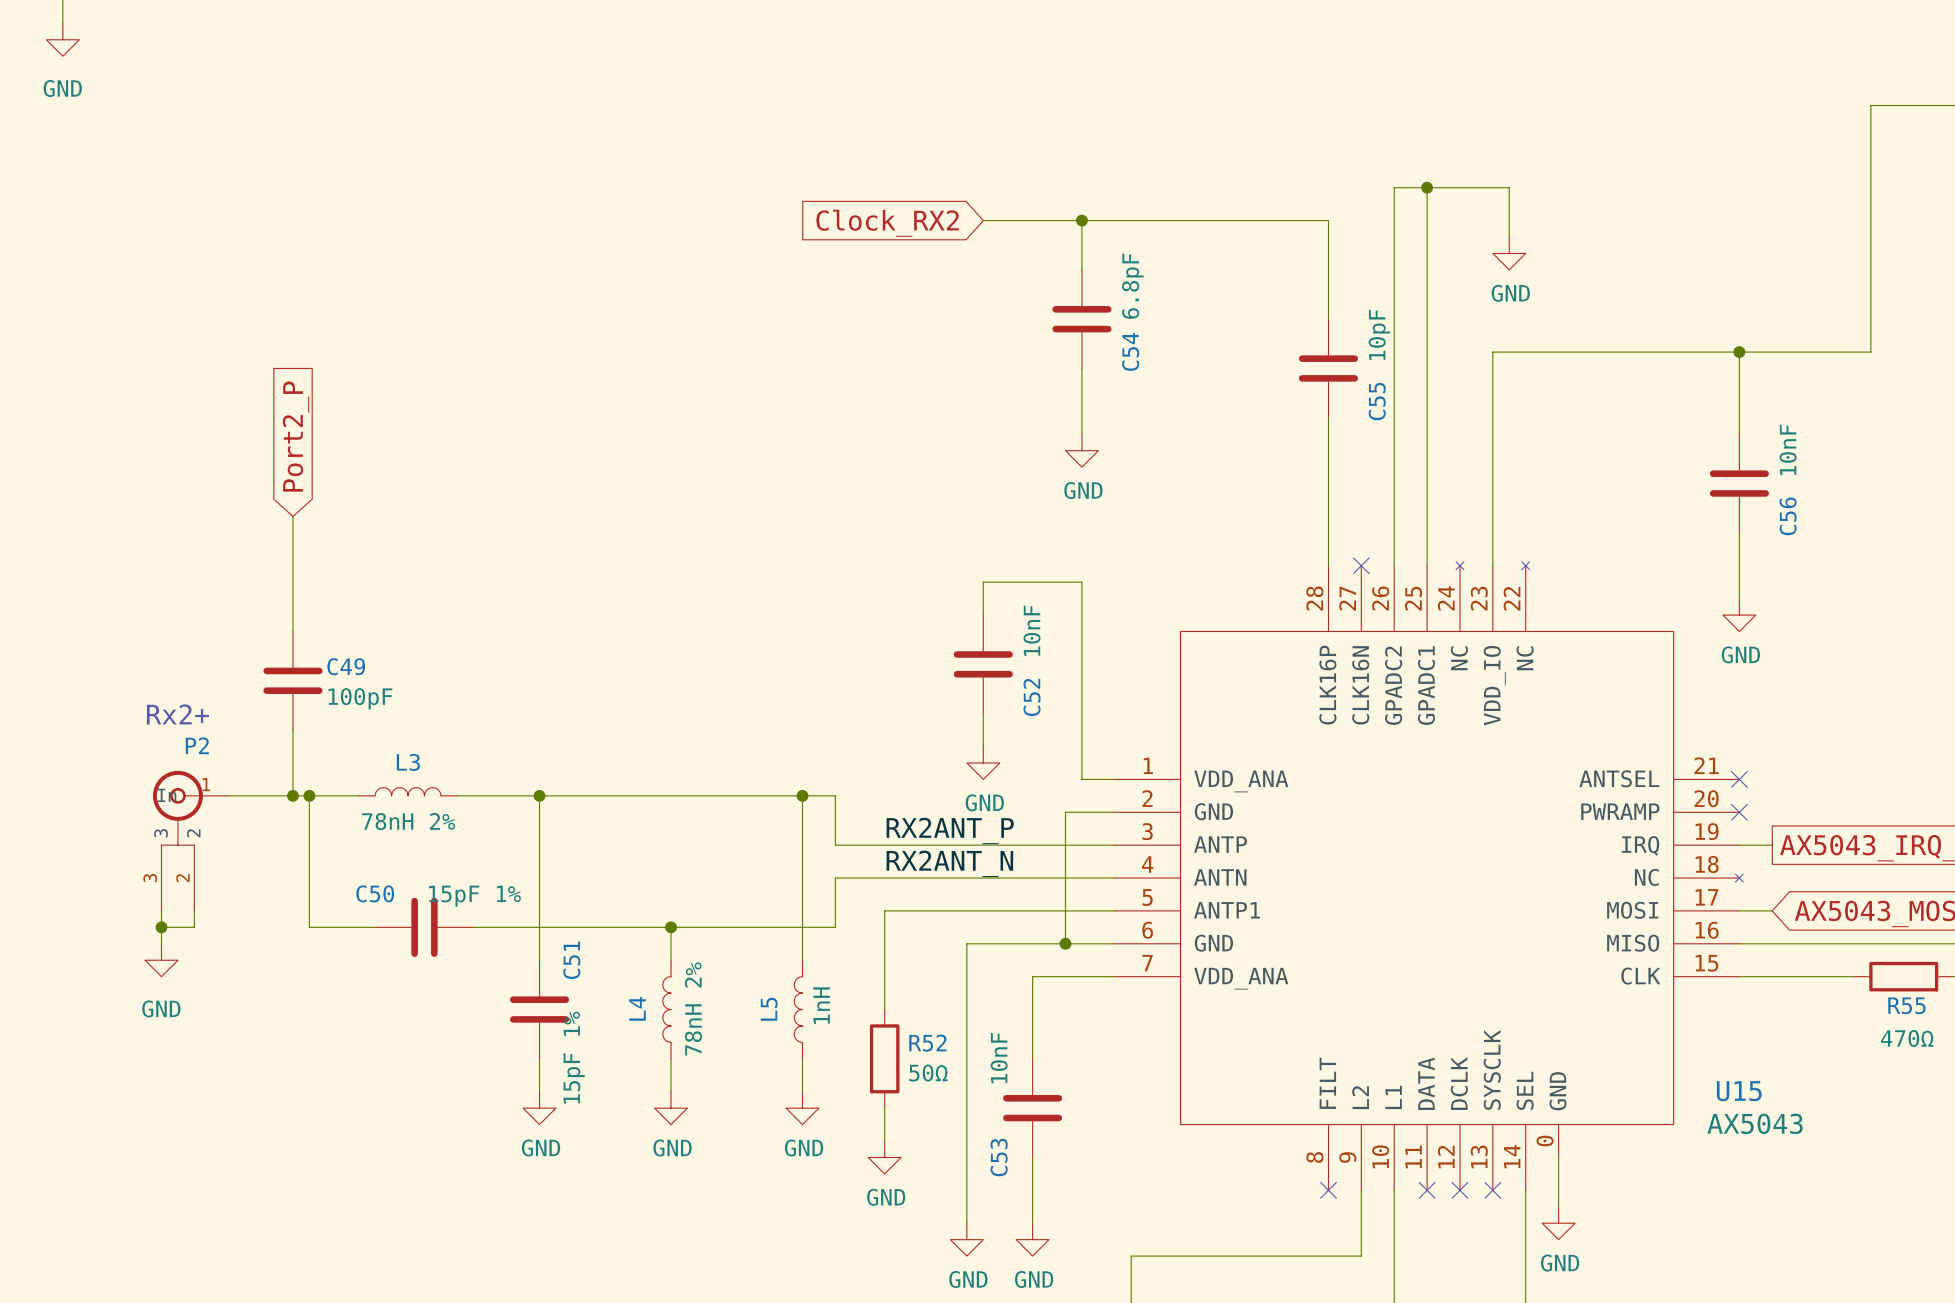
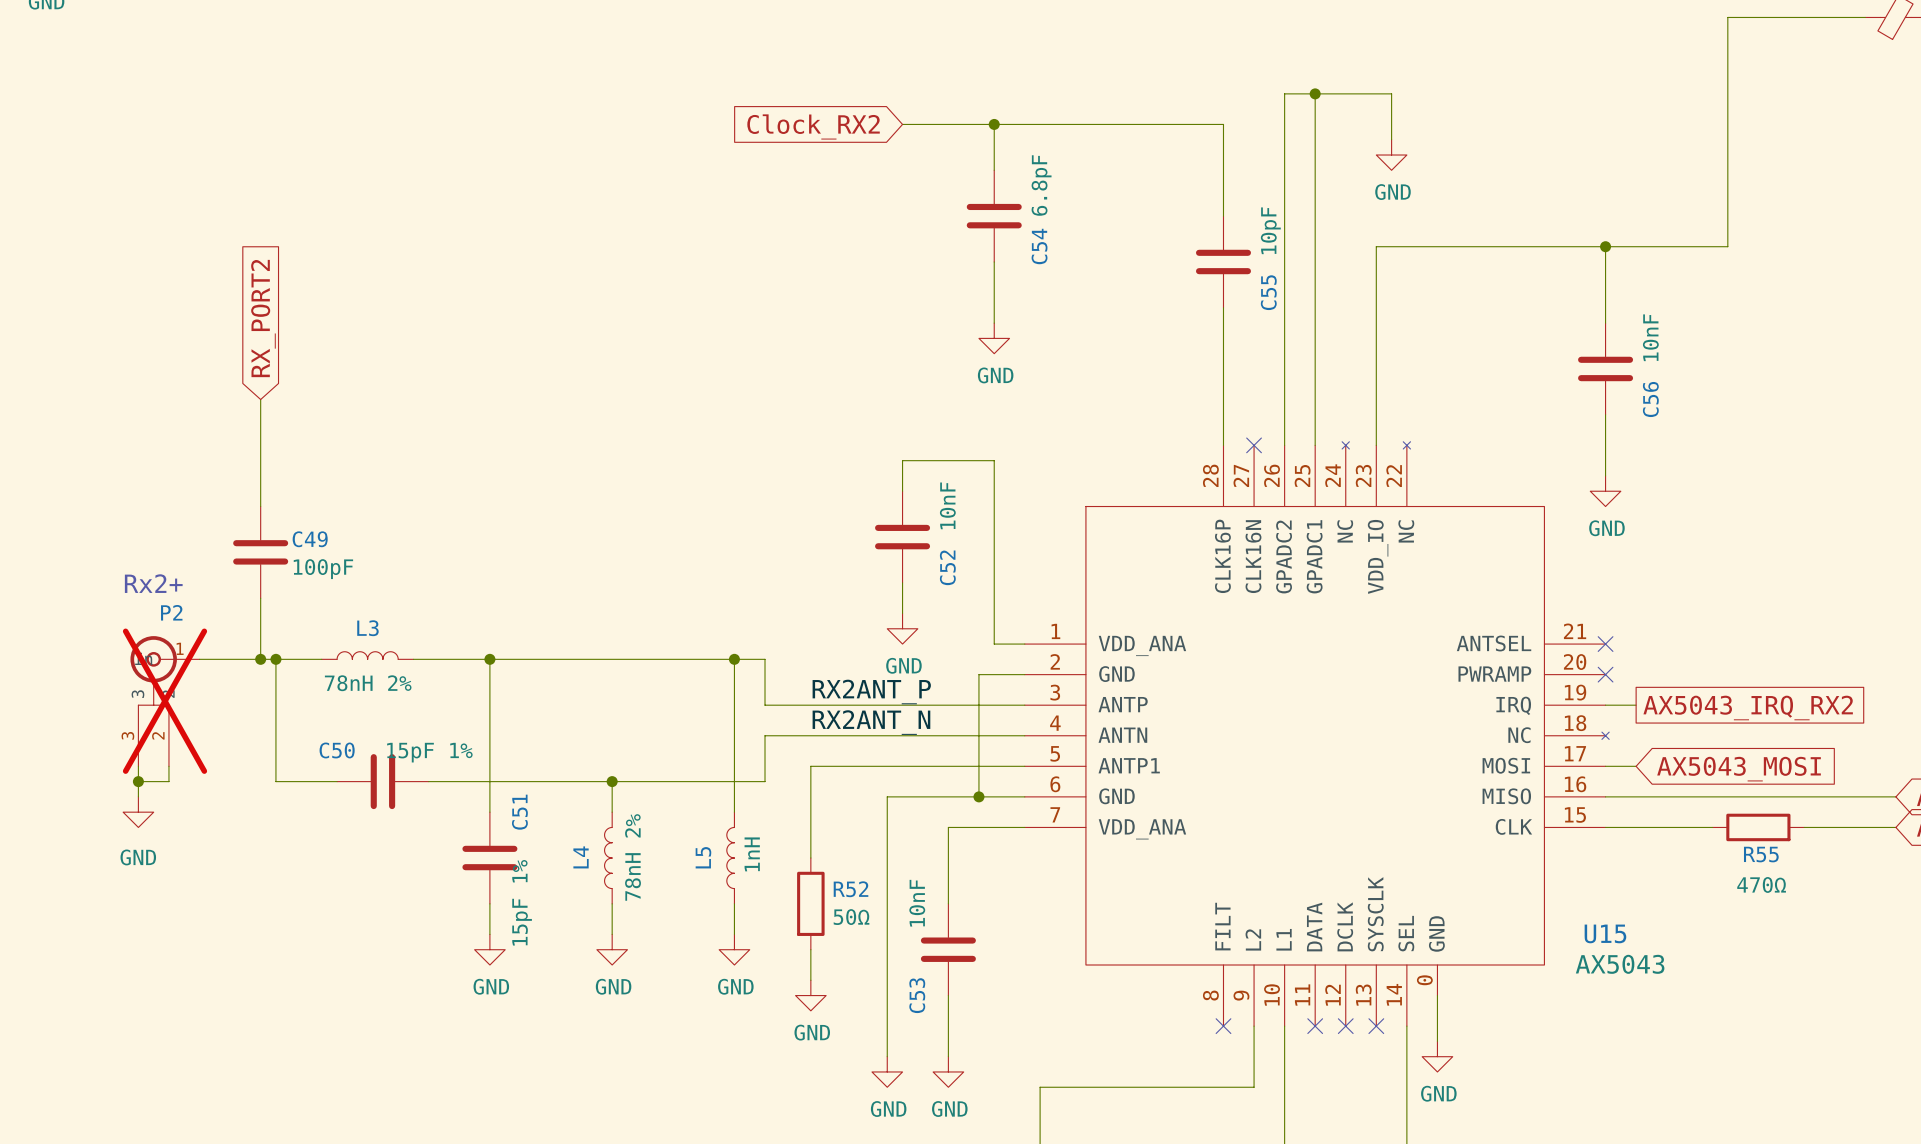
global label: Port2_P (295, 436) -> RX_PORT2 (263, 318)
P2 do-not-place cross: none -> (165, 701)

